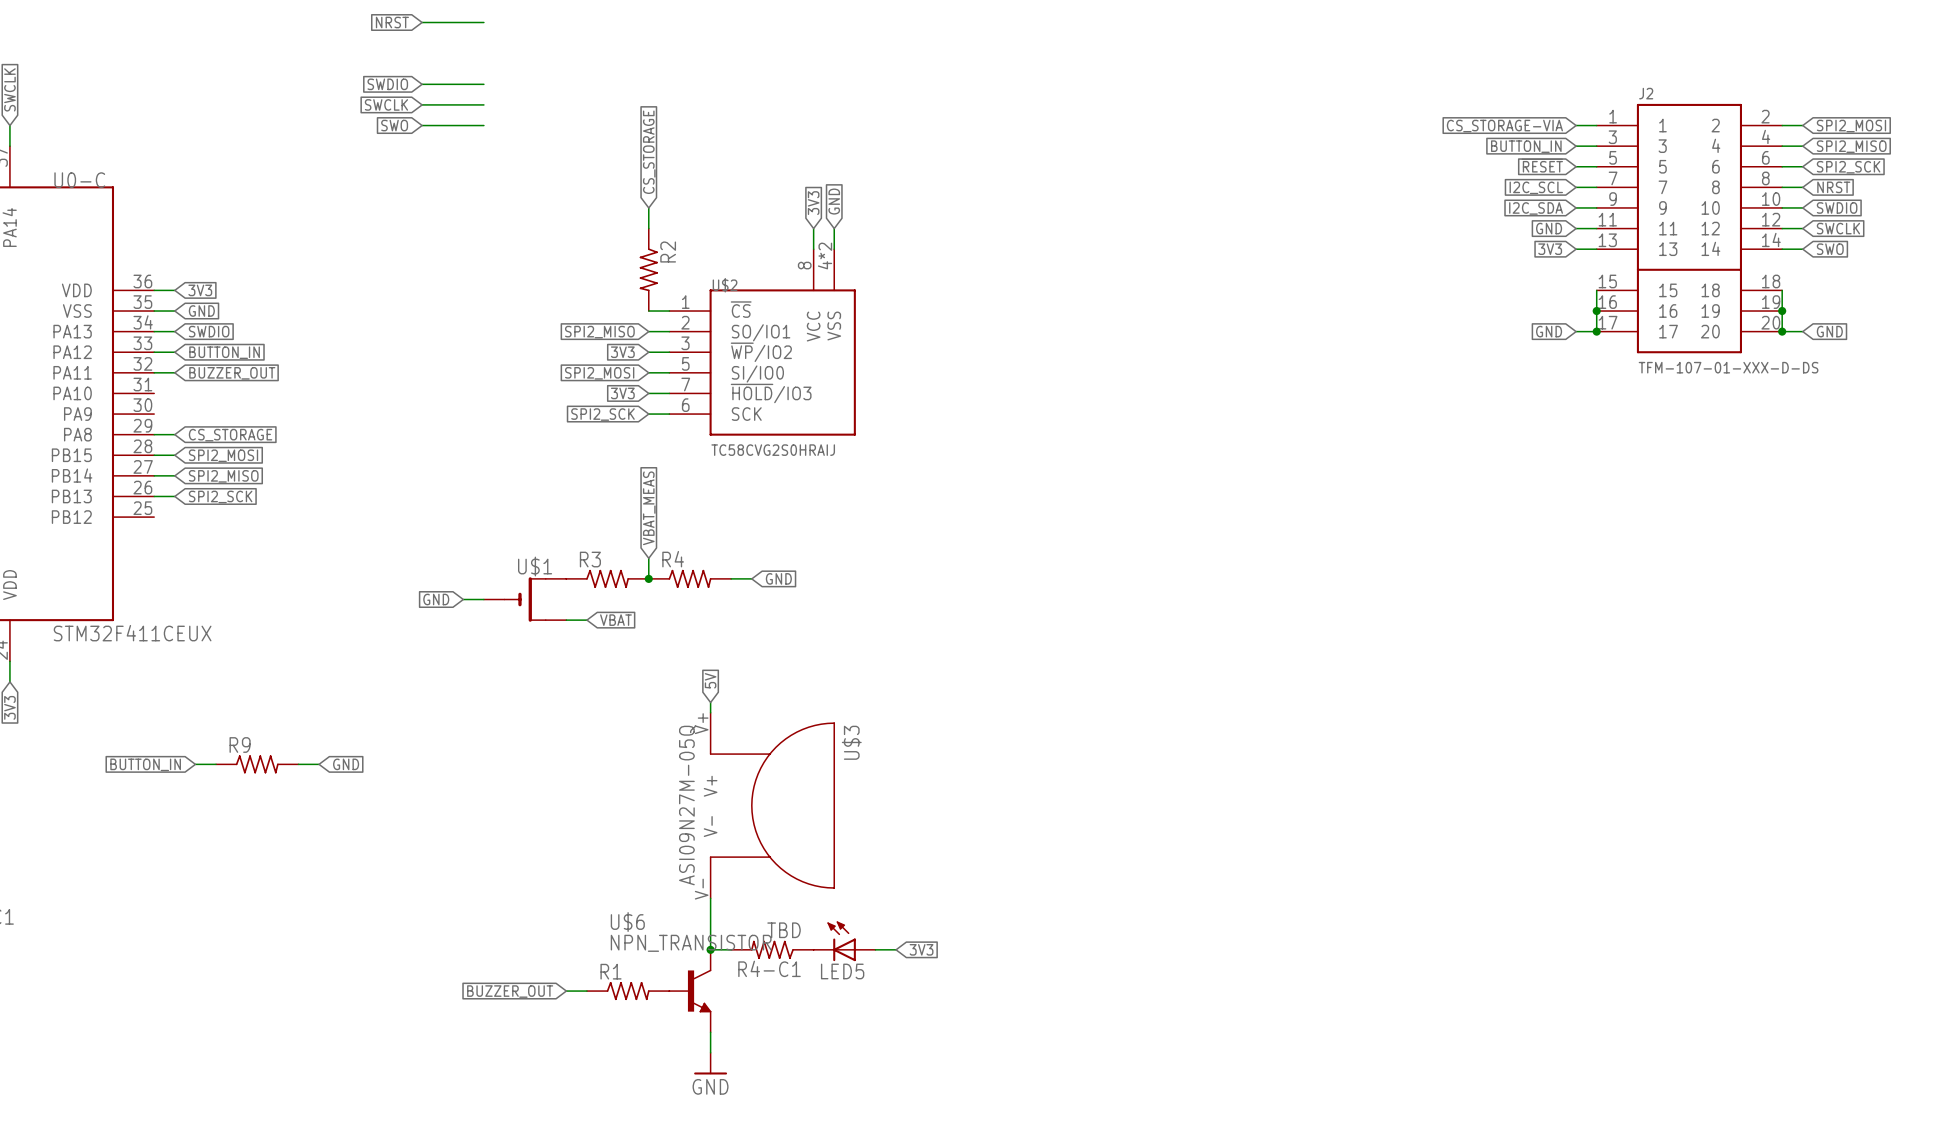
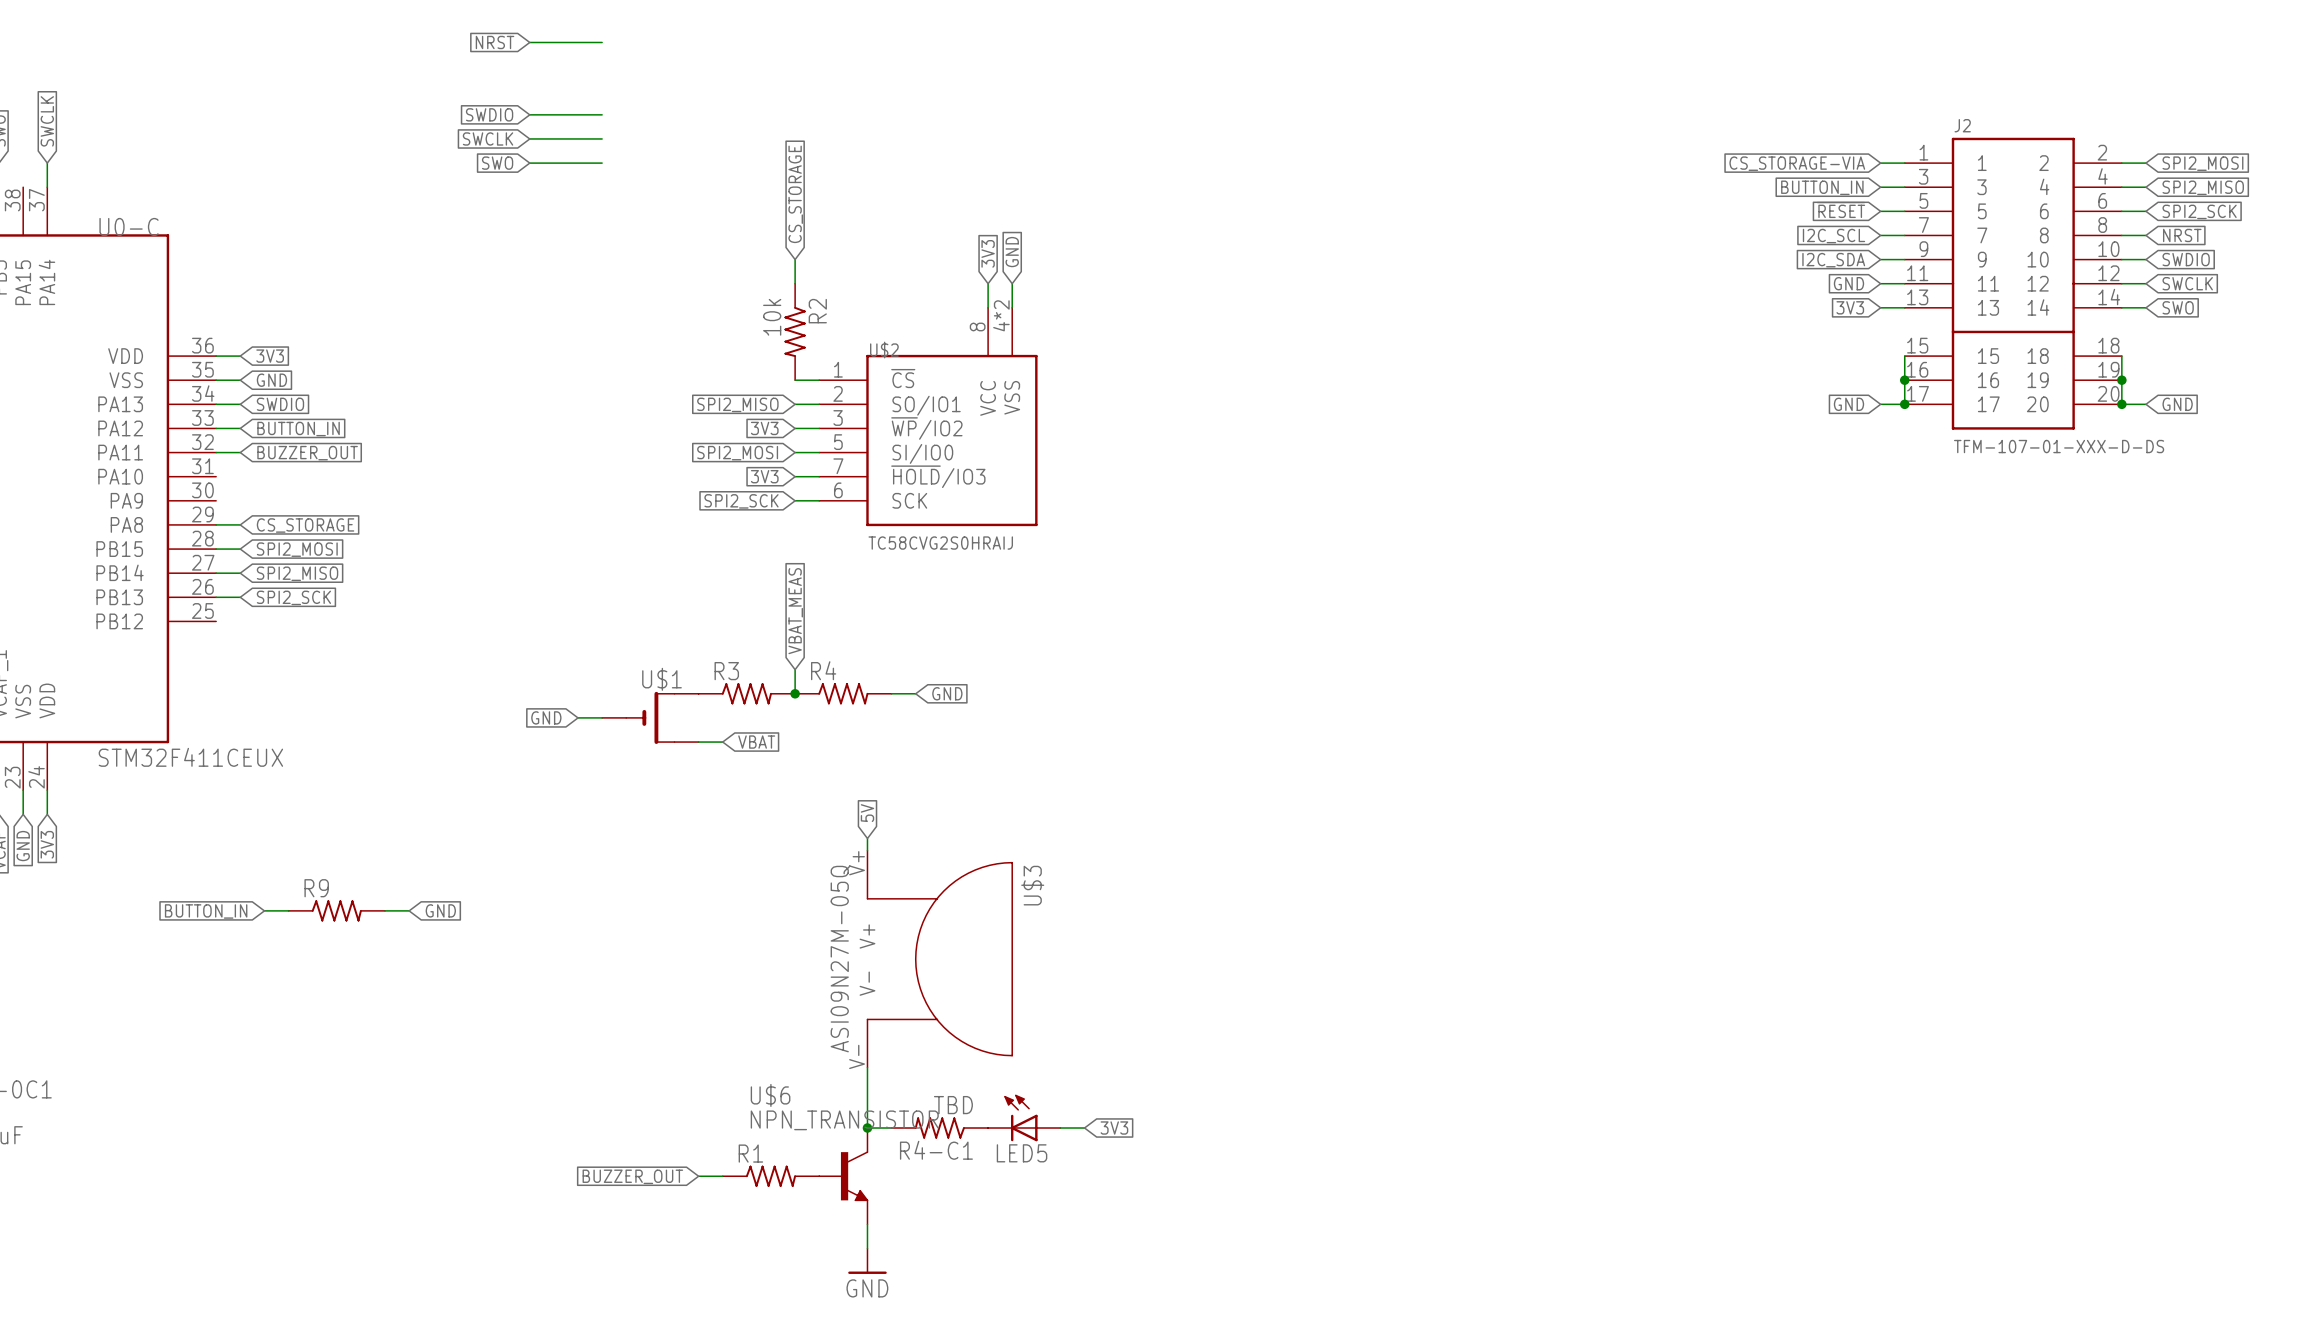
R2 value: none -> 10k (772, 317)

